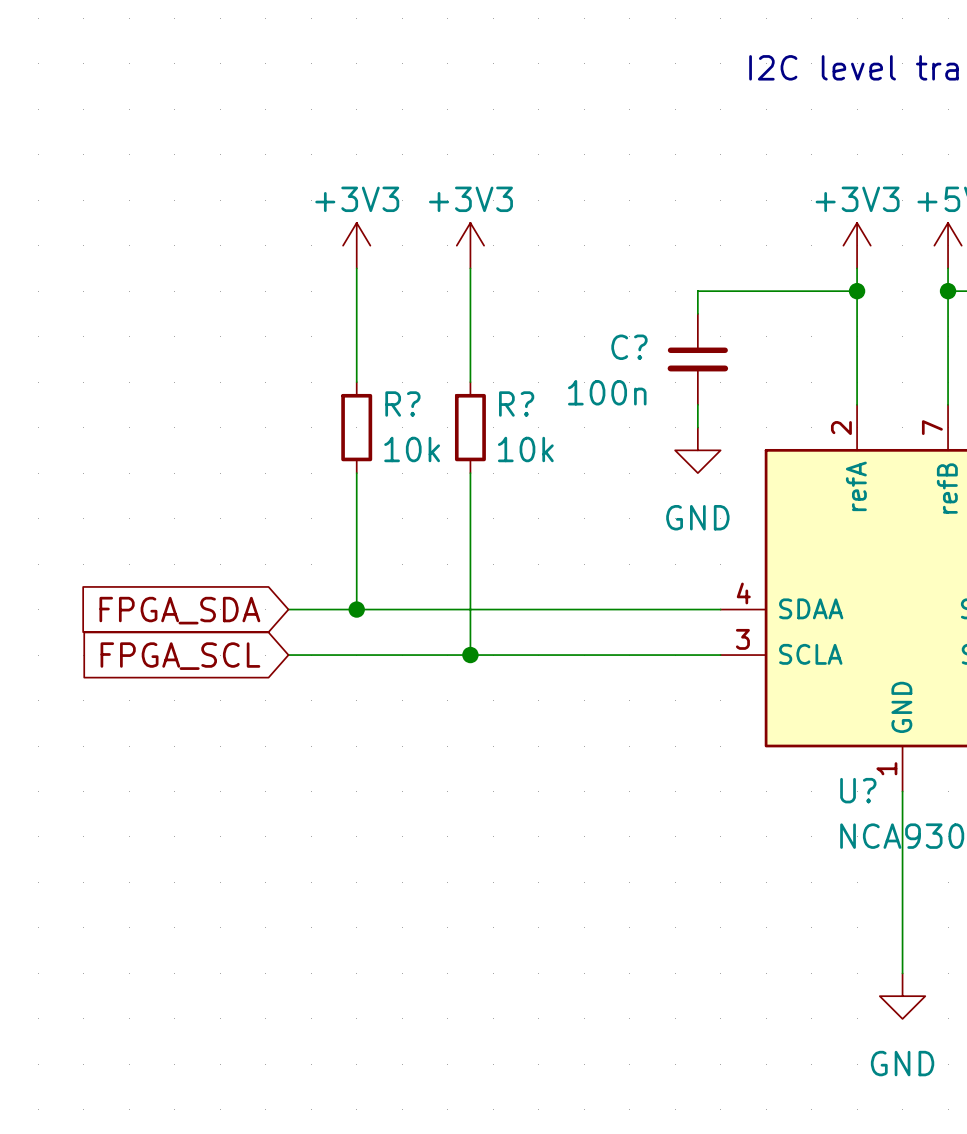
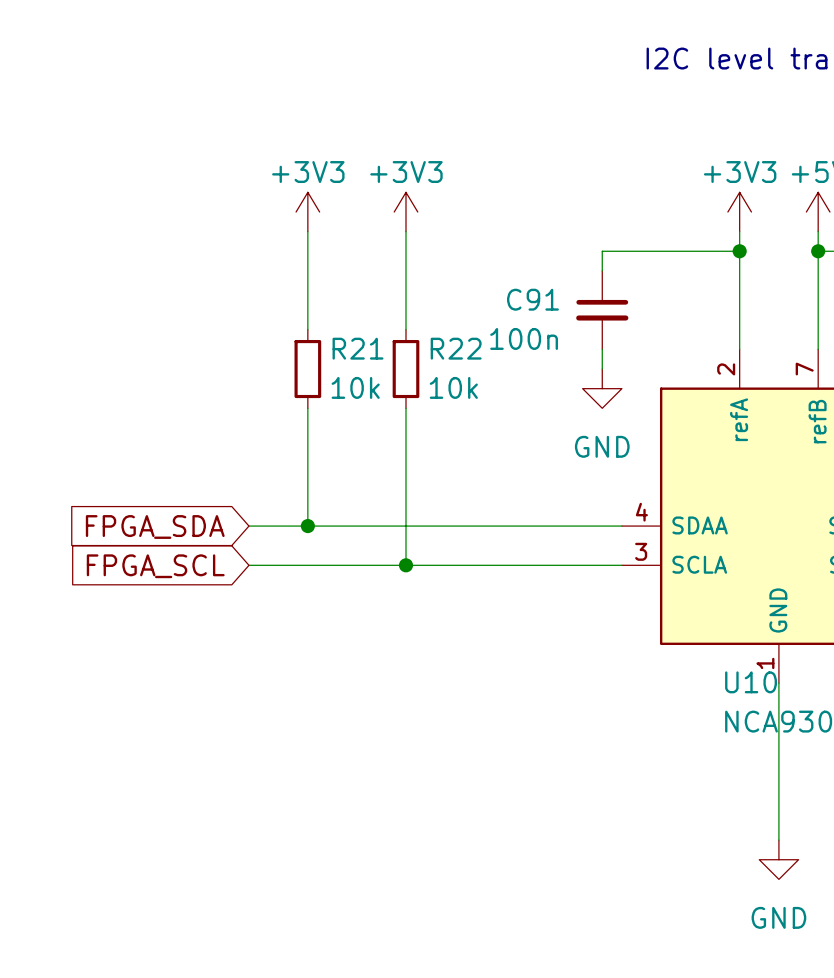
C? name: C? (629, 347) -> C91 (532, 299)
R? name: R? (402, 404) -> R21 (358, 348)
R? name: R? (516, 404) -> R22 (456, 348)
U? name: U? (858, 790) -> U10 (751, 682)

